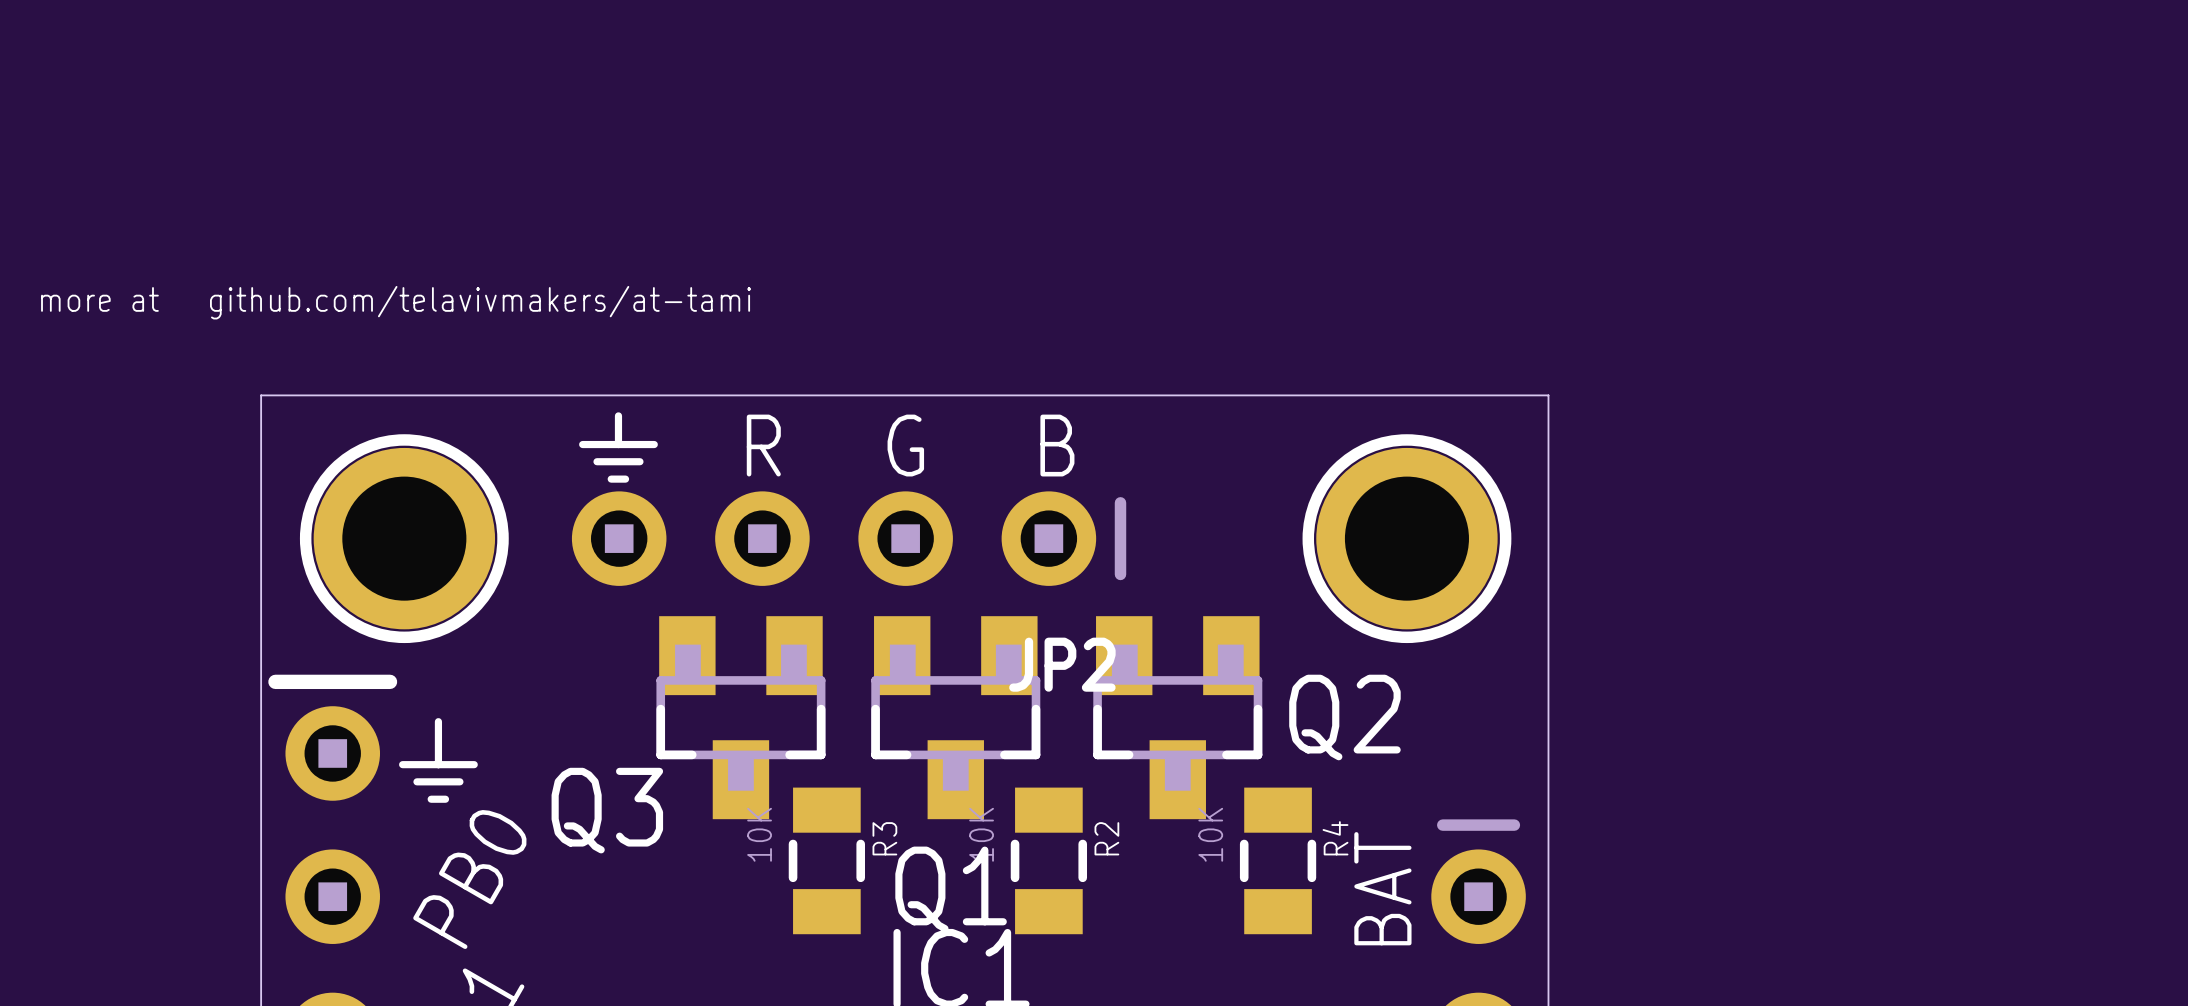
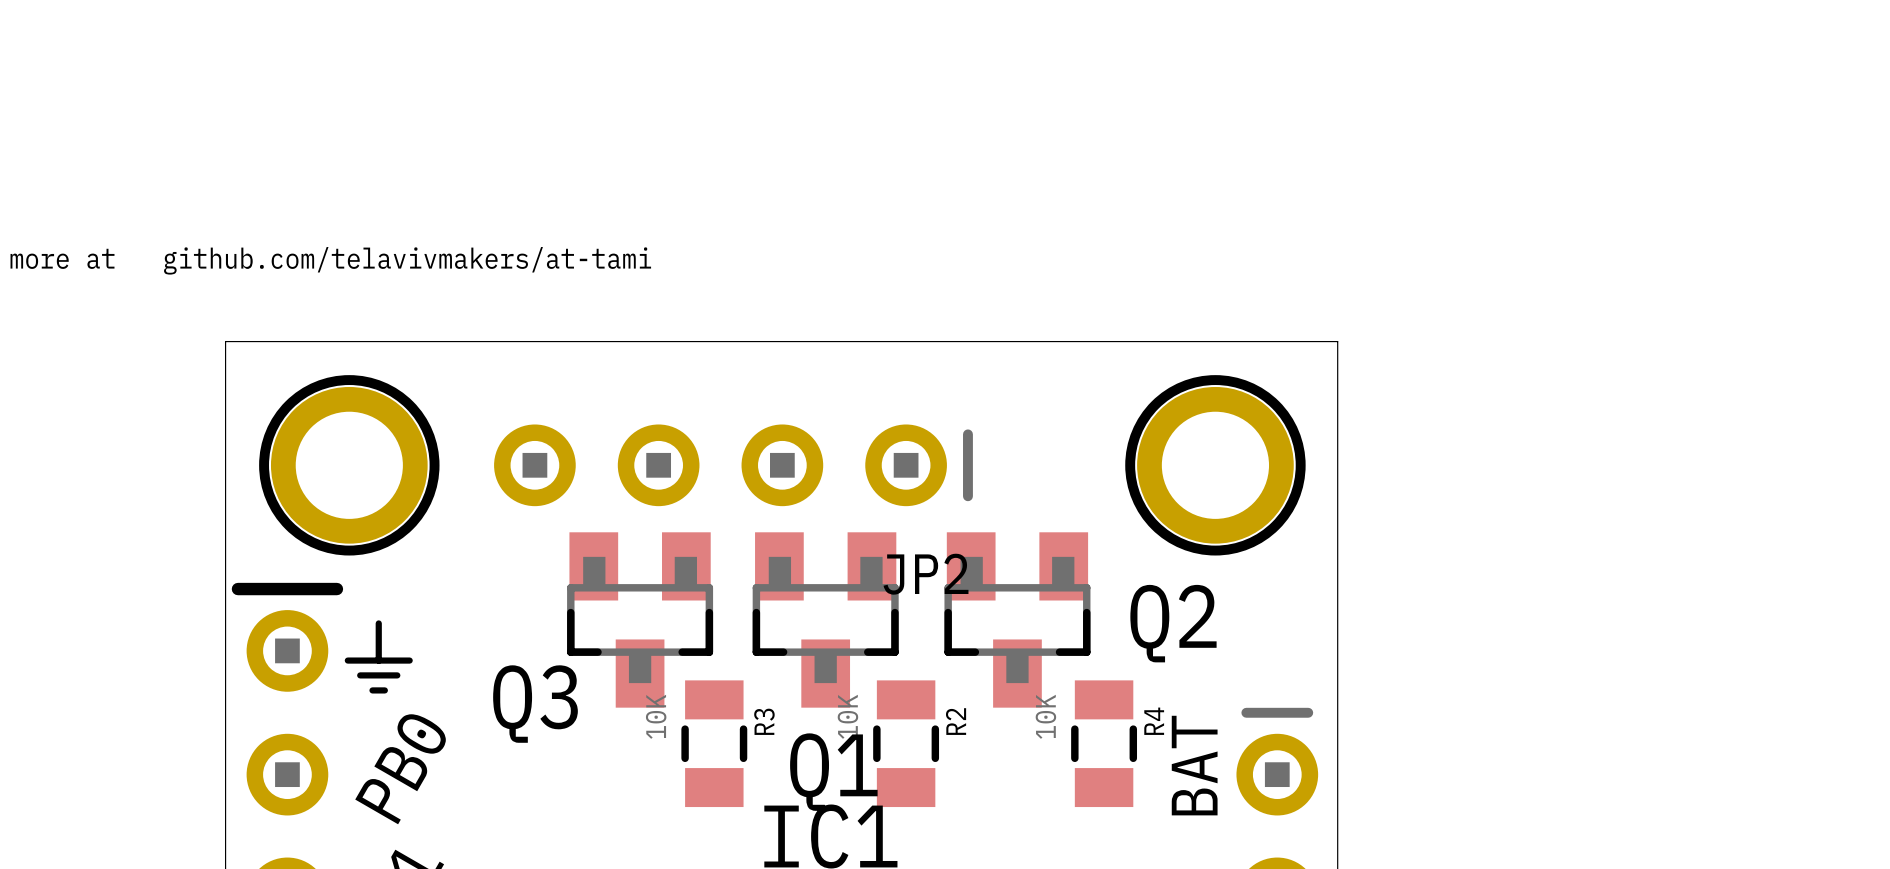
line: (618, 415) (618, 444) -> none
line: (582, 444) (654, 444) -> none
text: R (763, 445) -> none
text: G (905, 445) -> none
text: B (1057, 445) -> none
line: (596, 461) (639, 461) -> none
line: (611, 479) (625, 479) -> none

